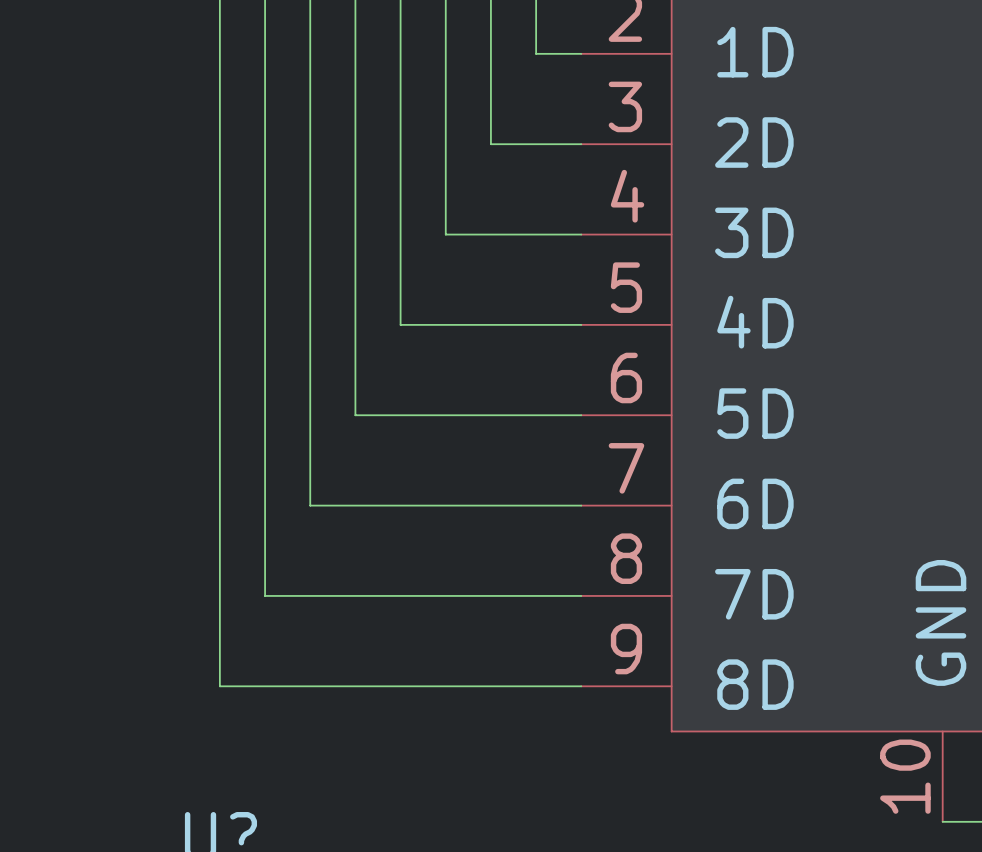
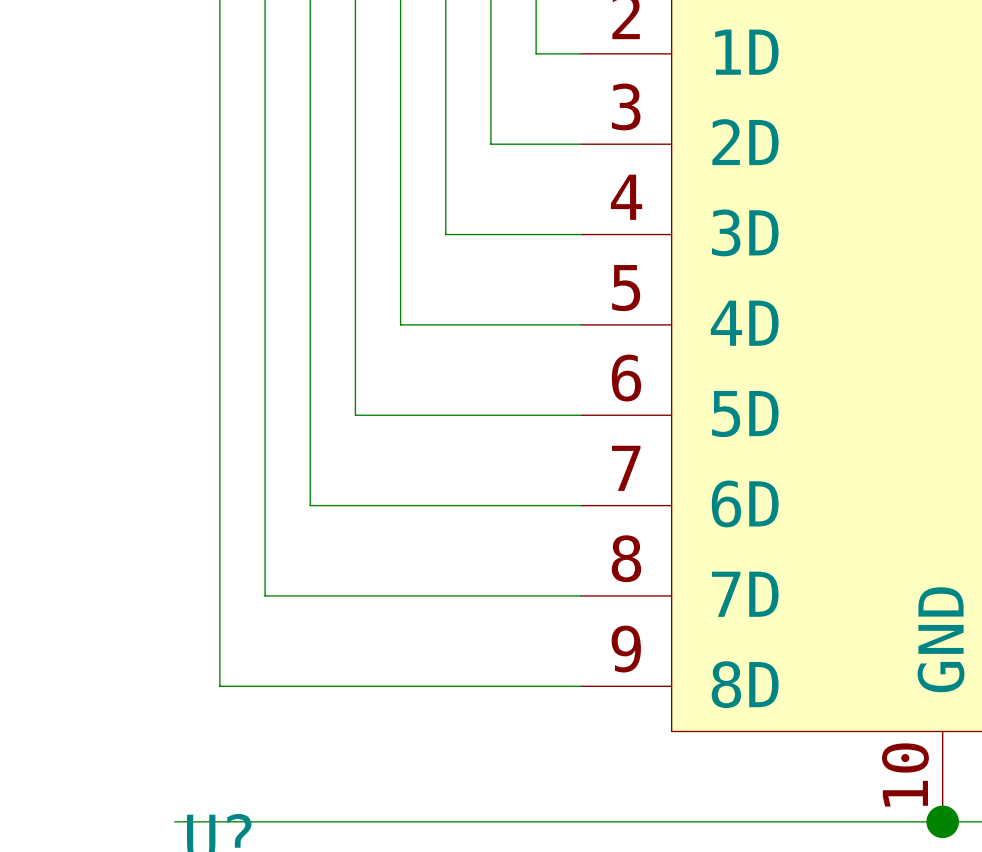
wire: none -> (174, 821) (942, 821)
junction: none -> (942, 821)

